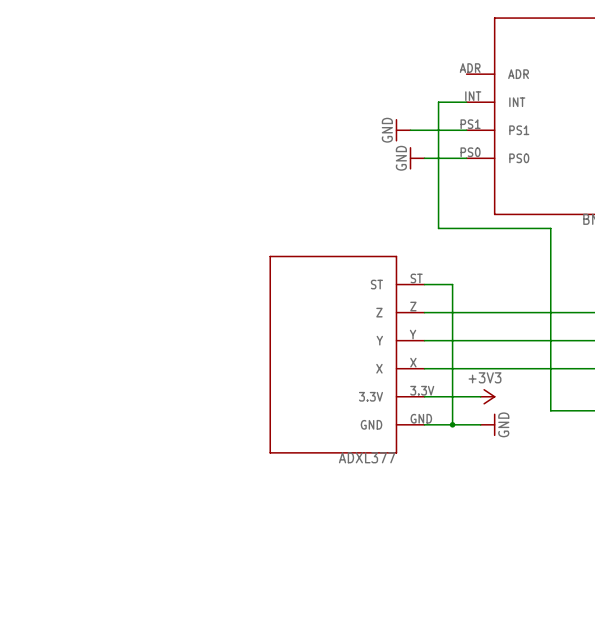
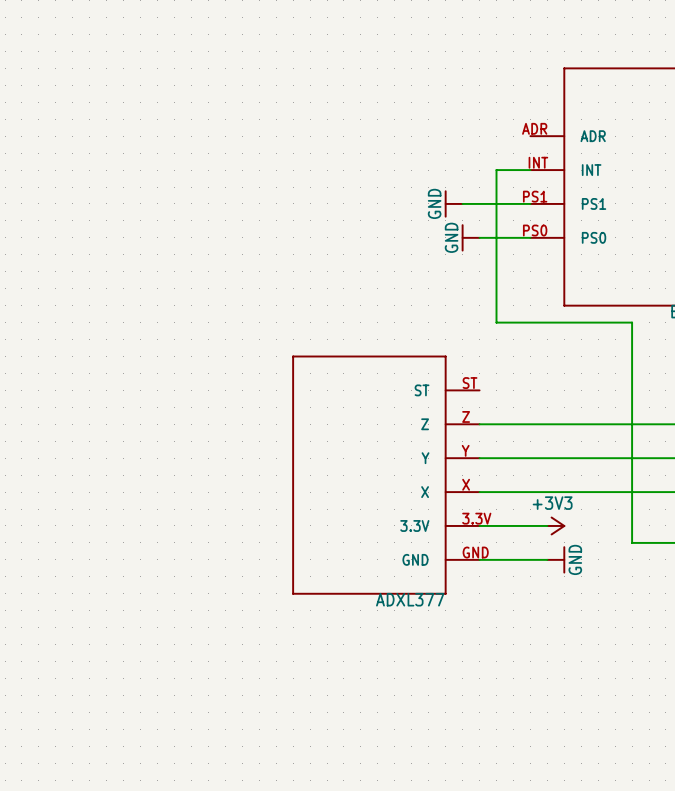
wire: (424, 284) (452, 284) (452, 424) -> none
junction: (452, 424) -> none

